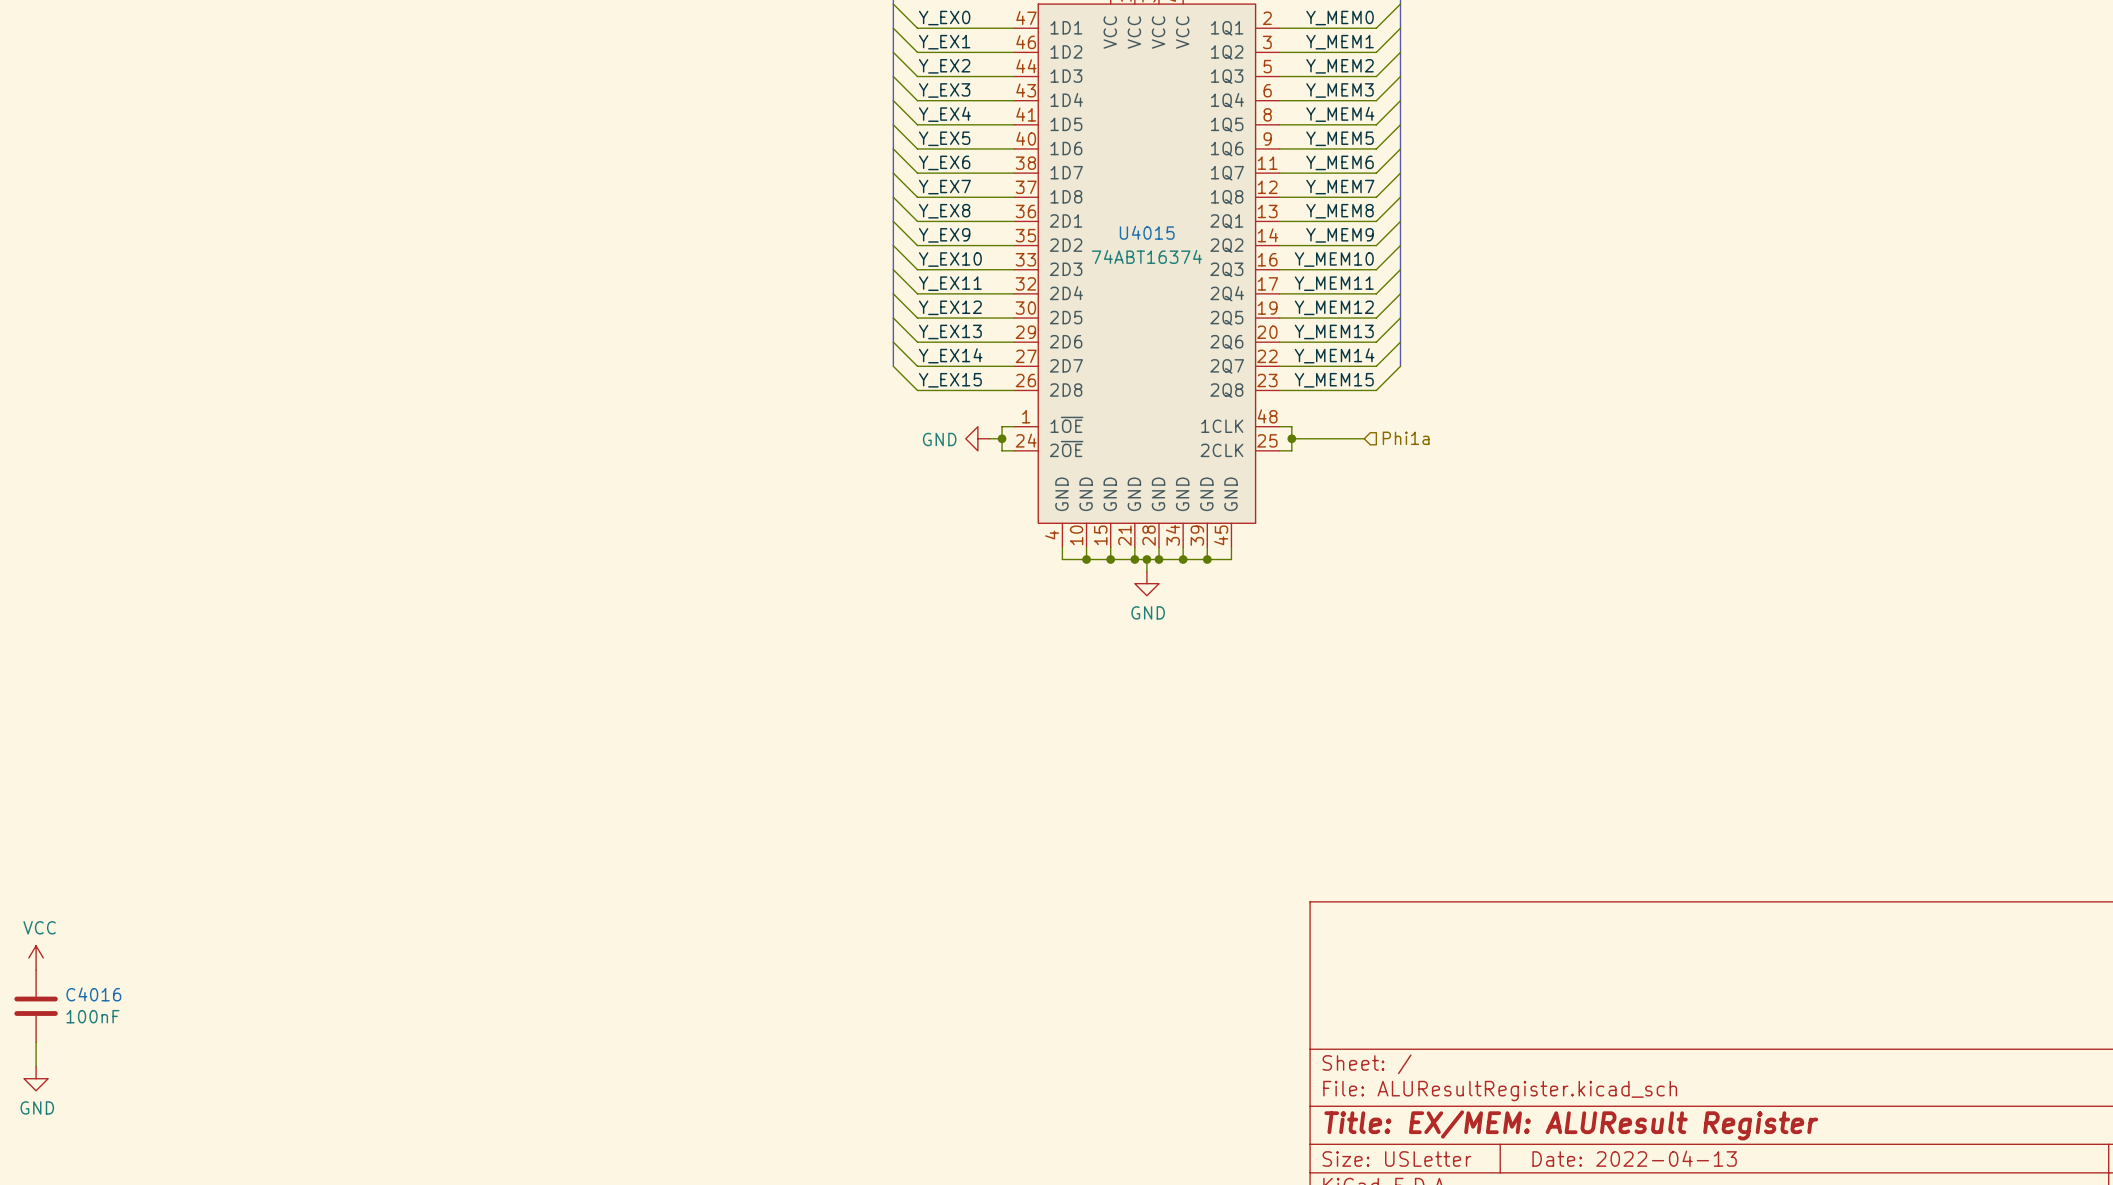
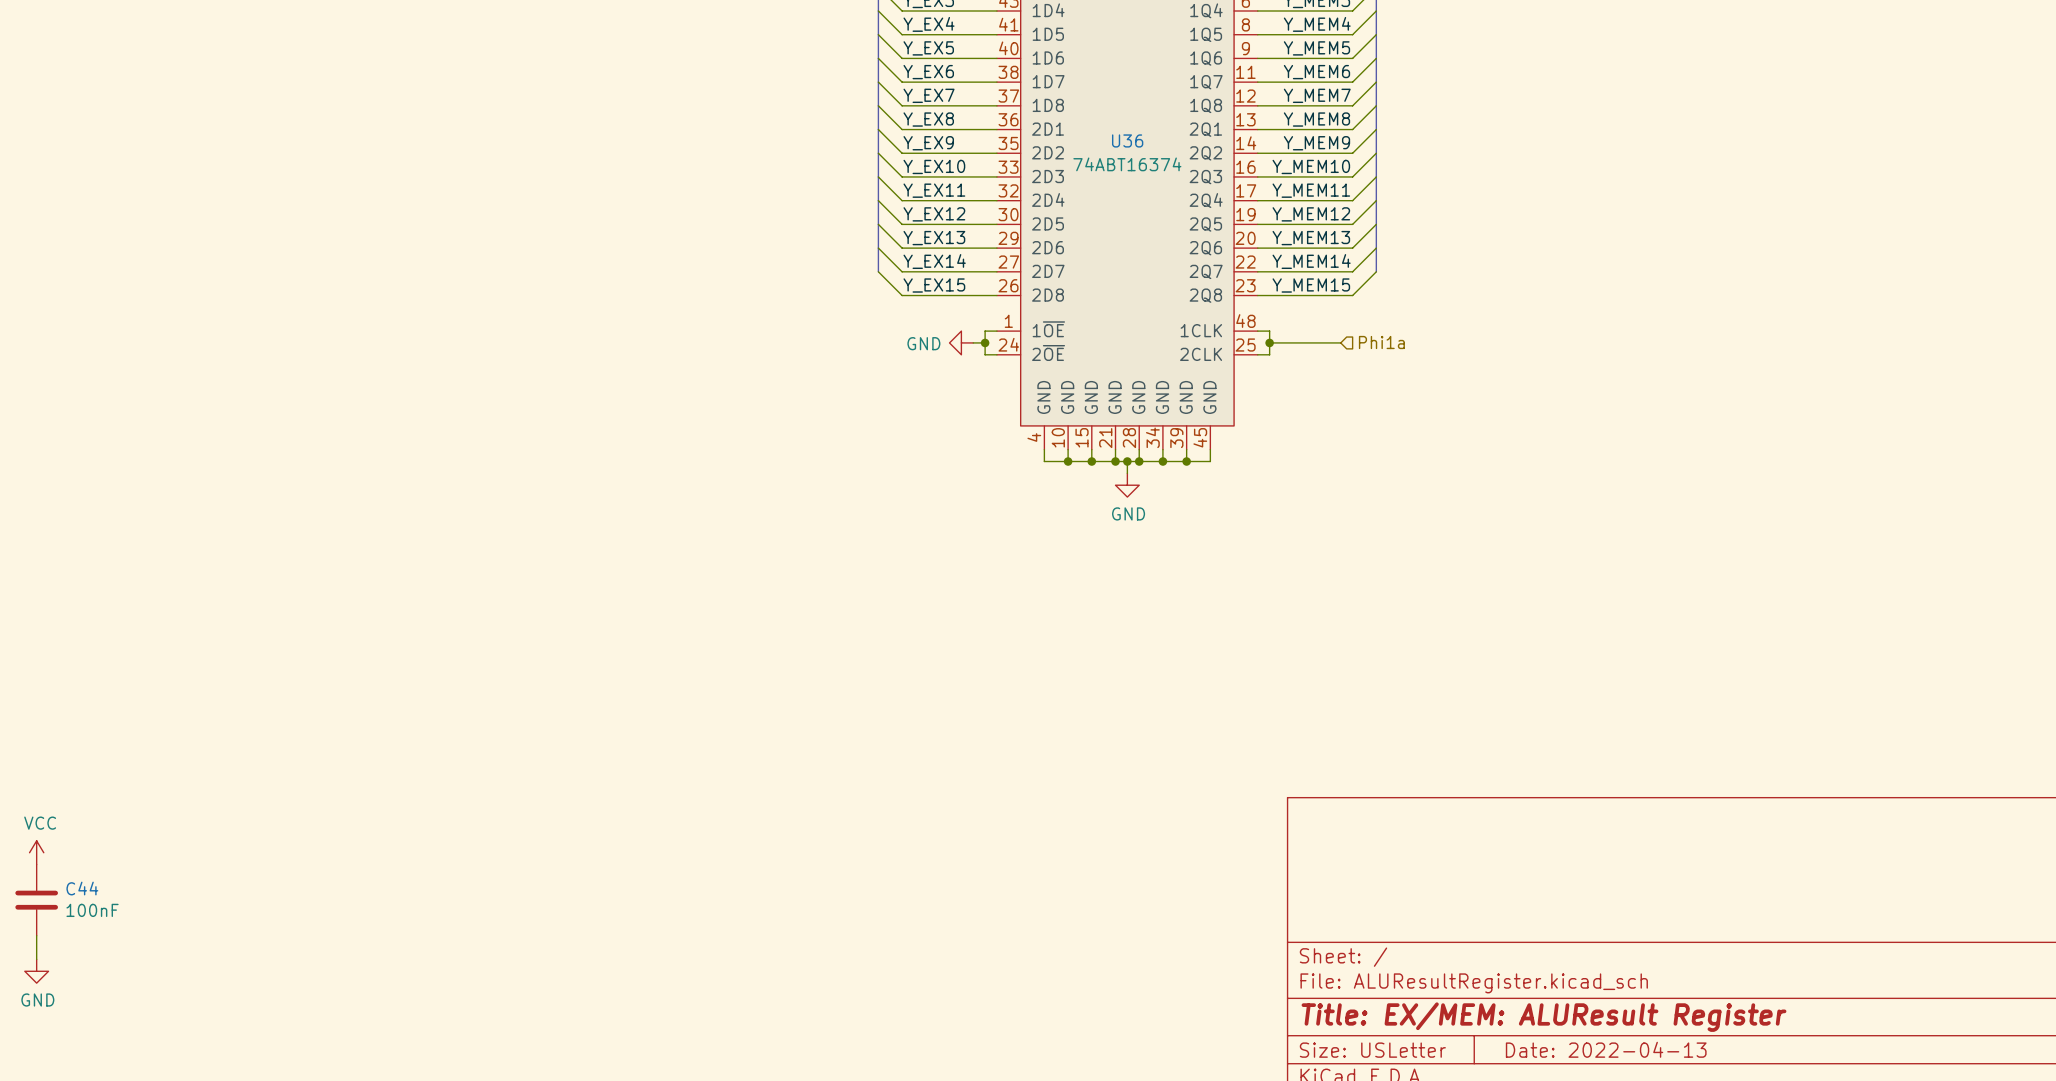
U4015 name: U4015 (1147, 232) -> U36 (1127, 140)
C4016 name: C4016 (93, 994) -> C44 (82, 888)

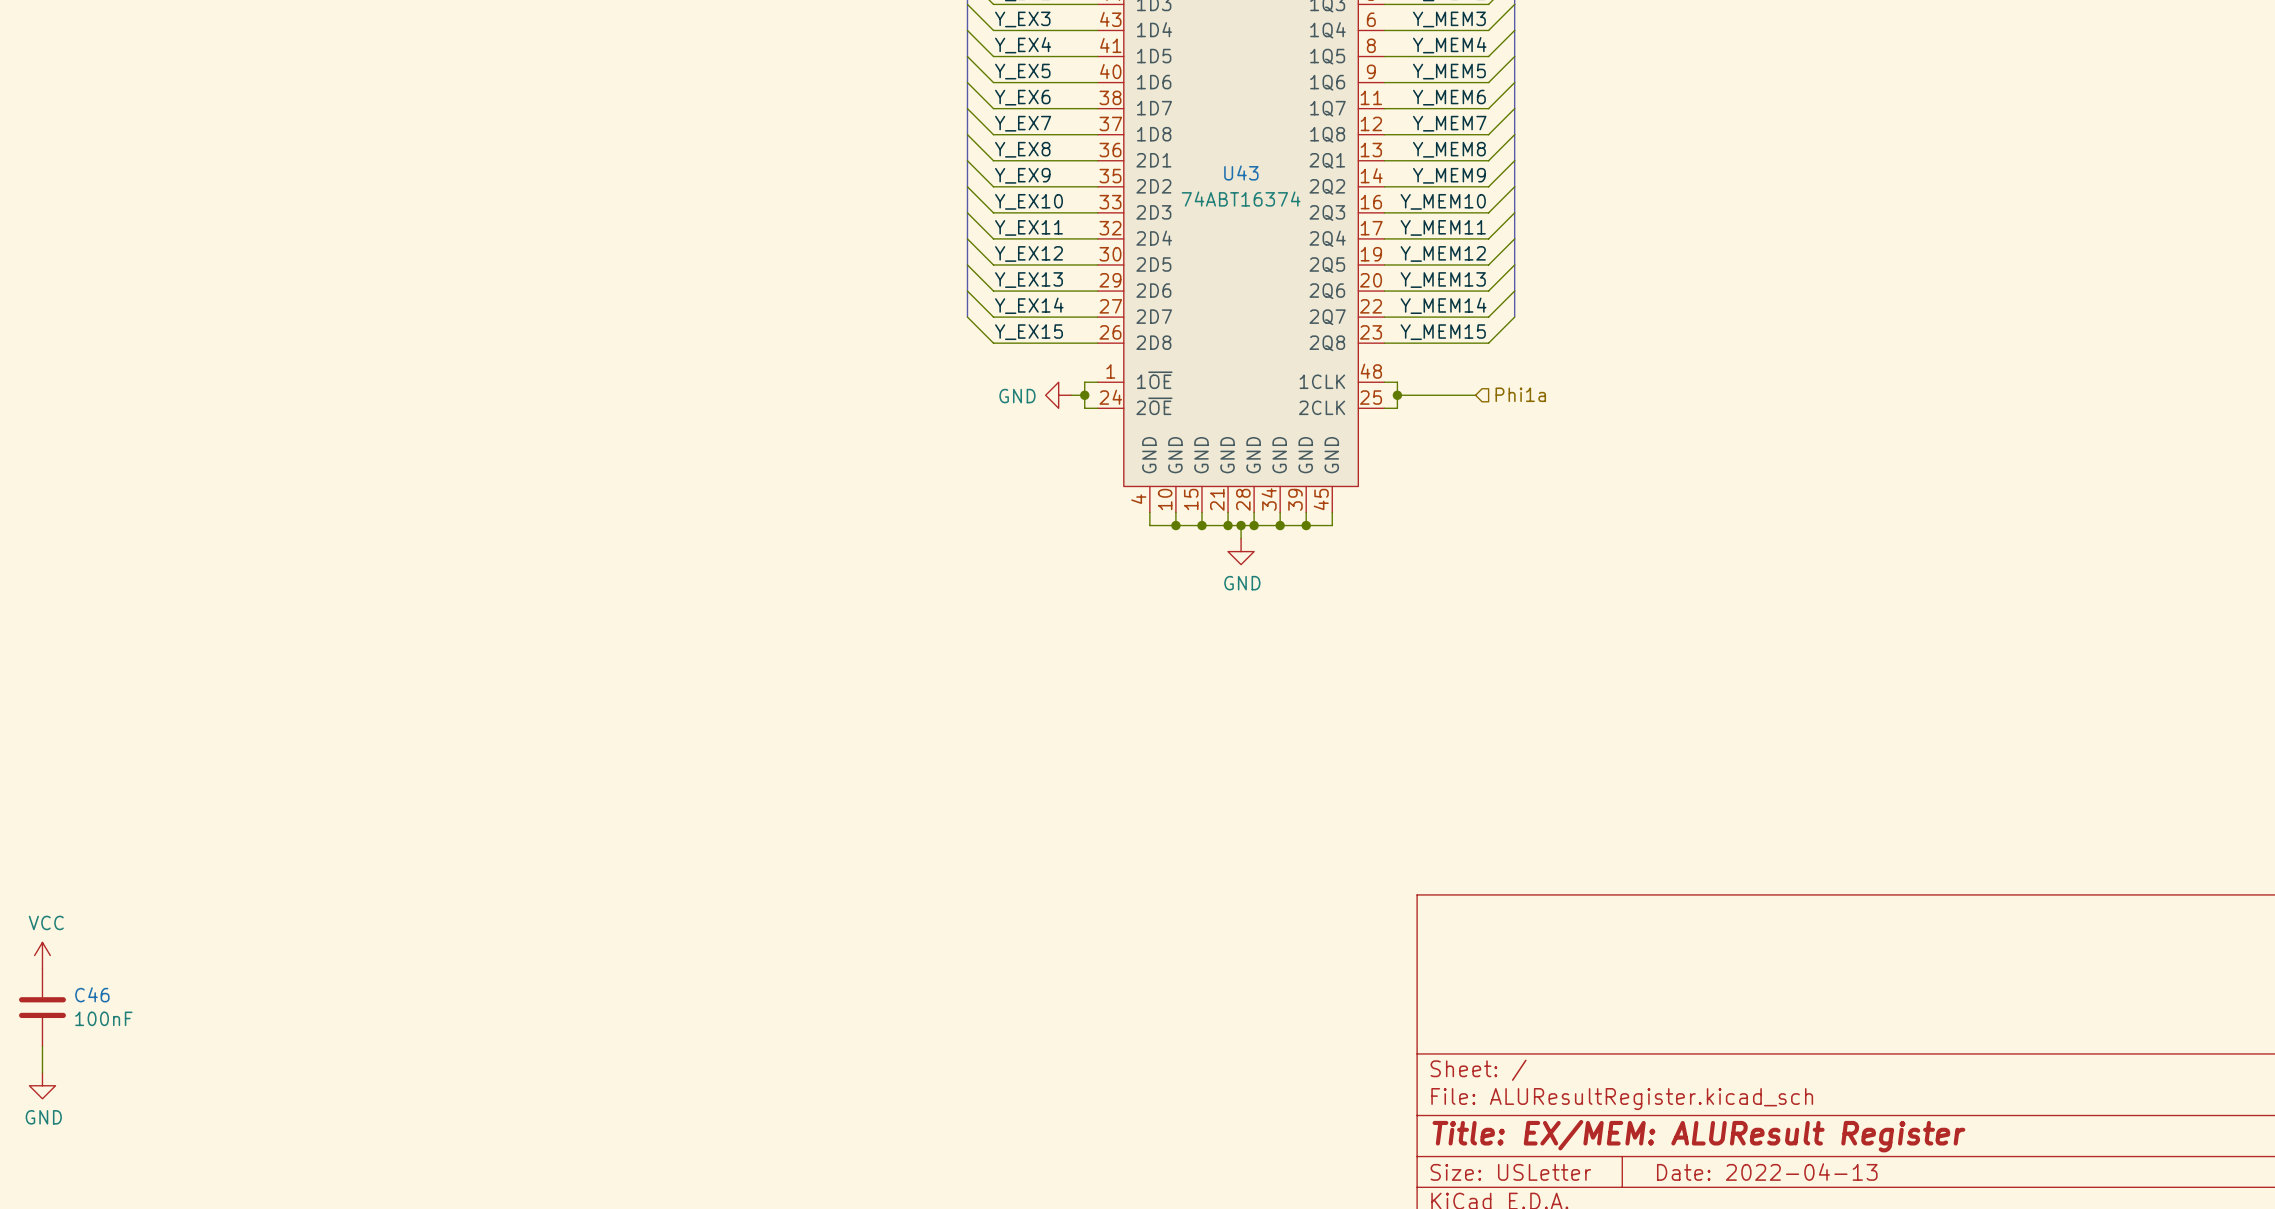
U36 name: U36 (1127, 140) -> U43 (1241, 172)
C44 name: C44 (82, 888) -> C46 (92, 994)

